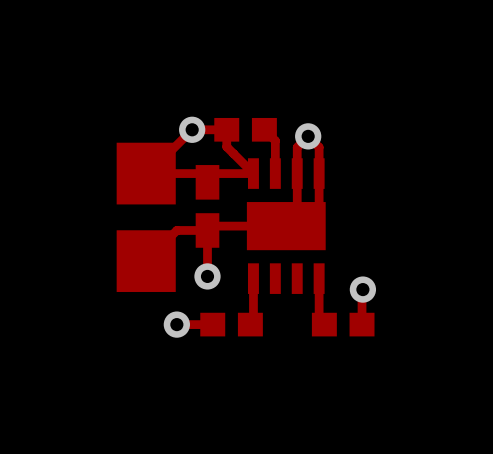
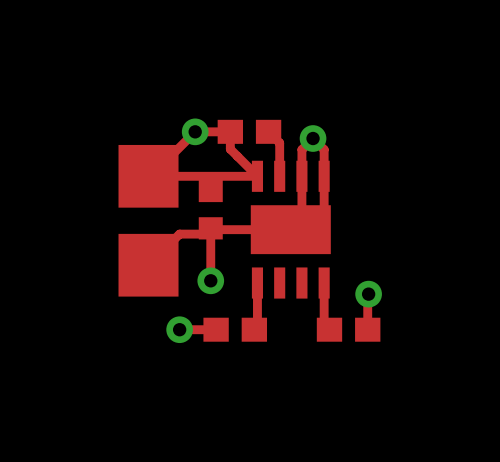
part footprint: [195, 165, 220, 248] -> [198, 179, 223, 240]

